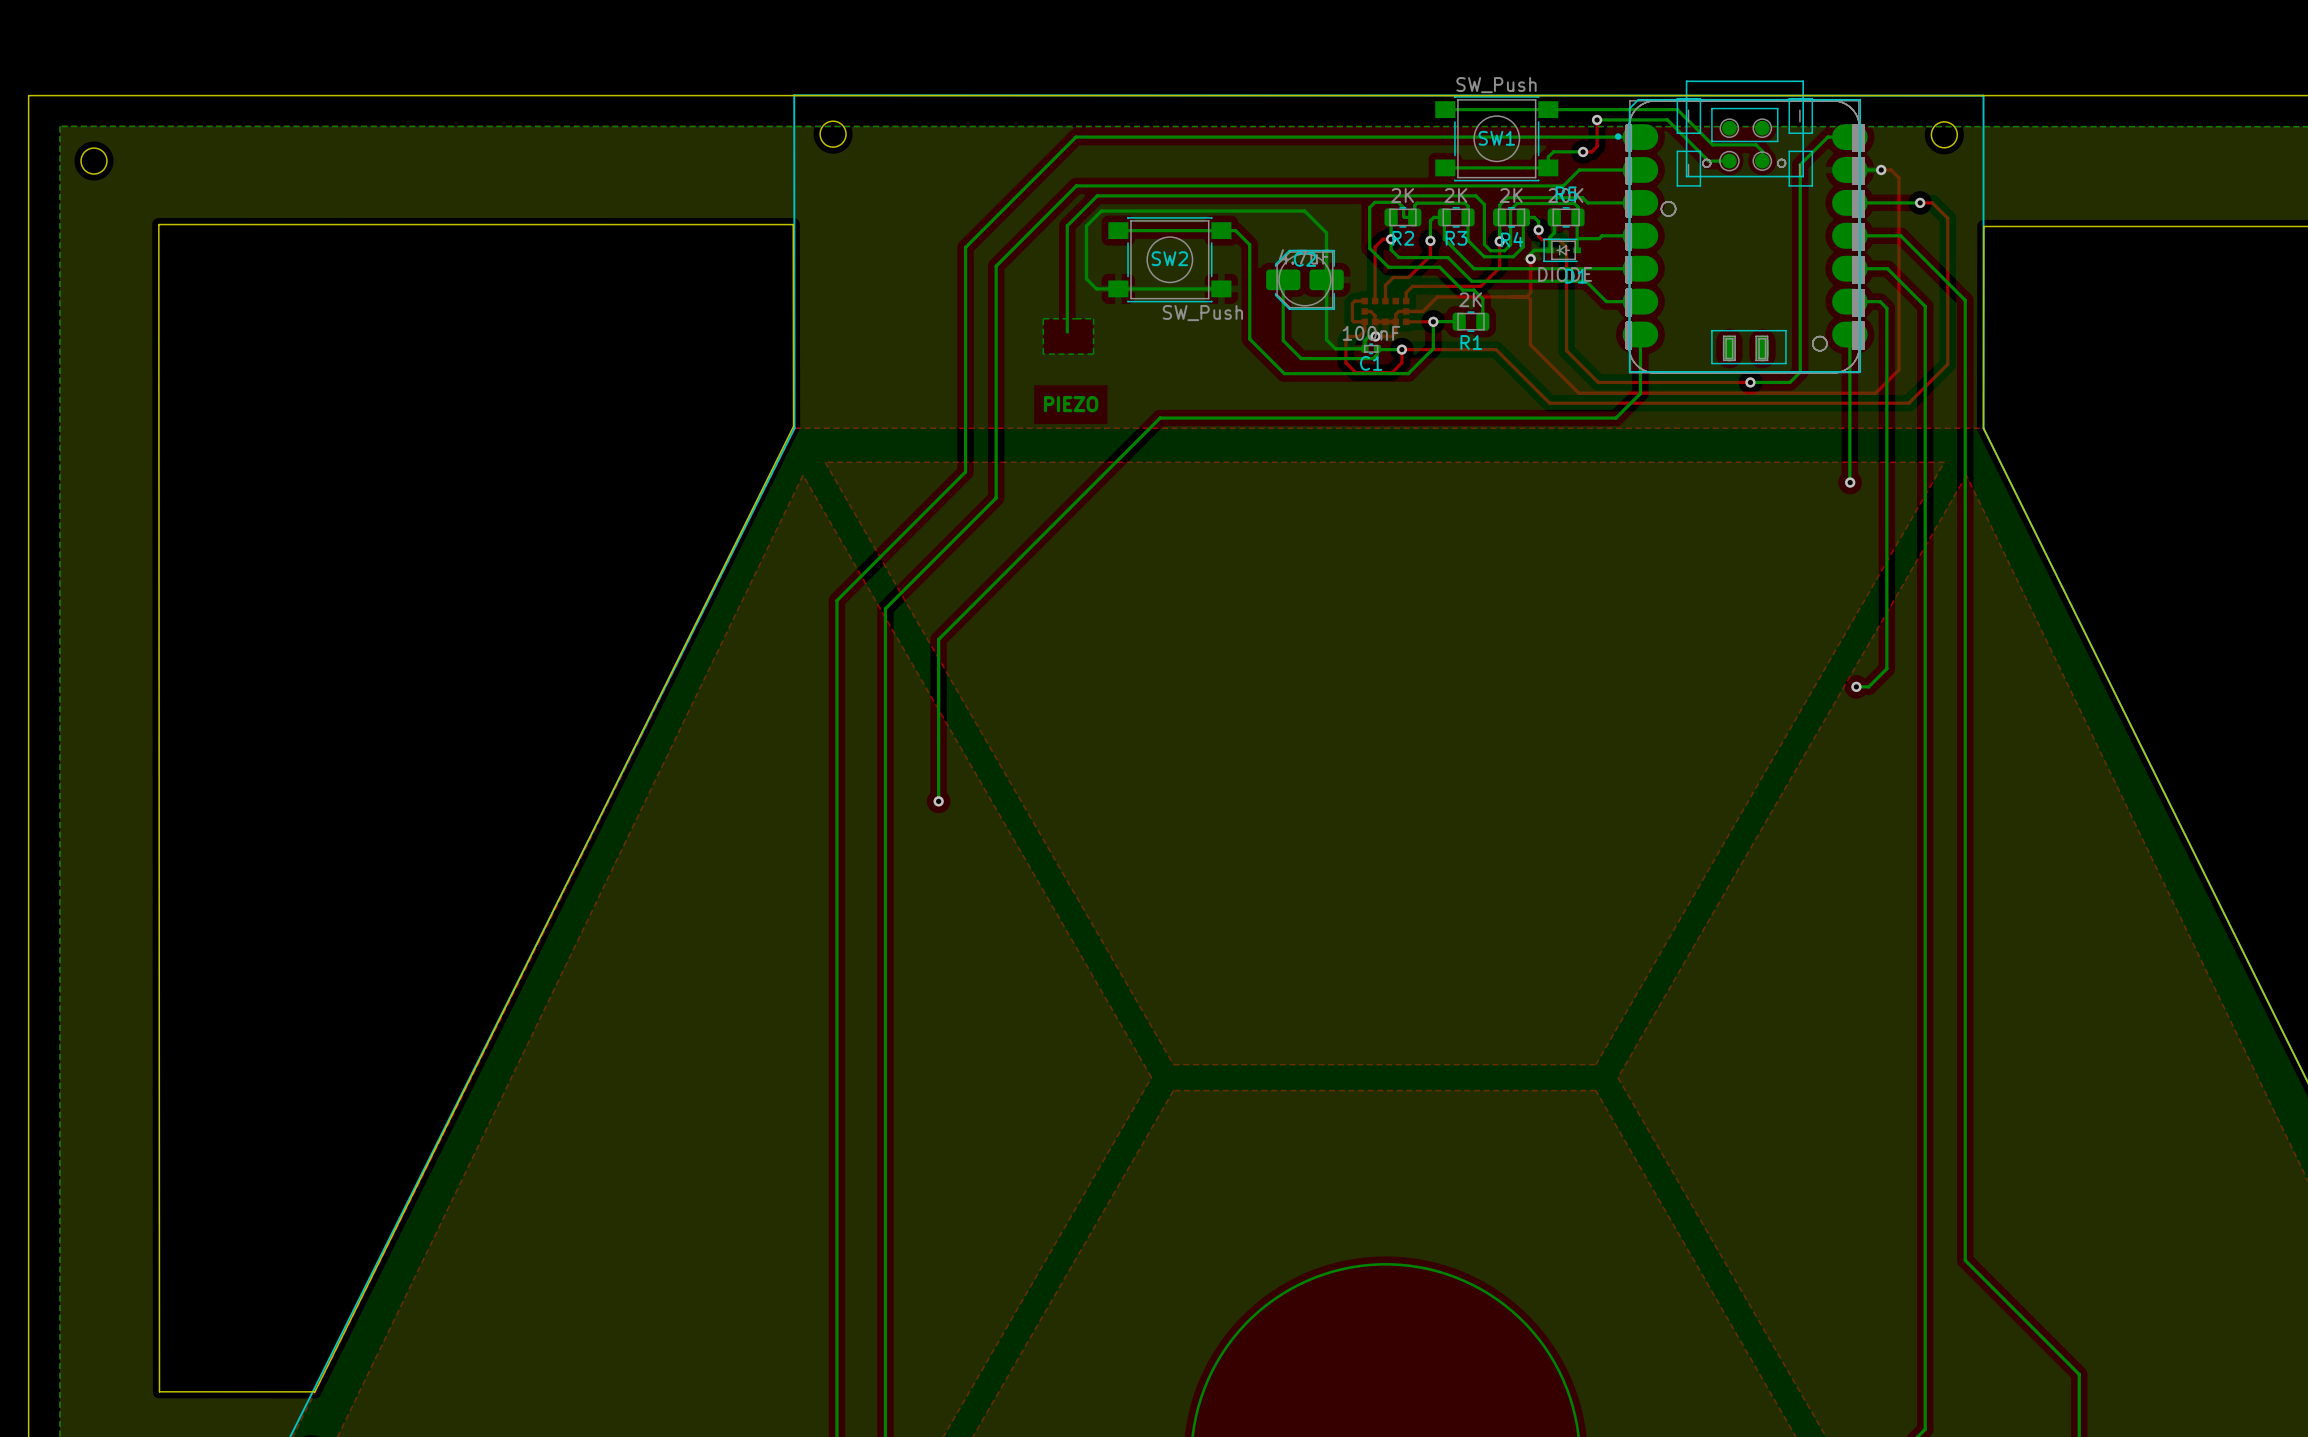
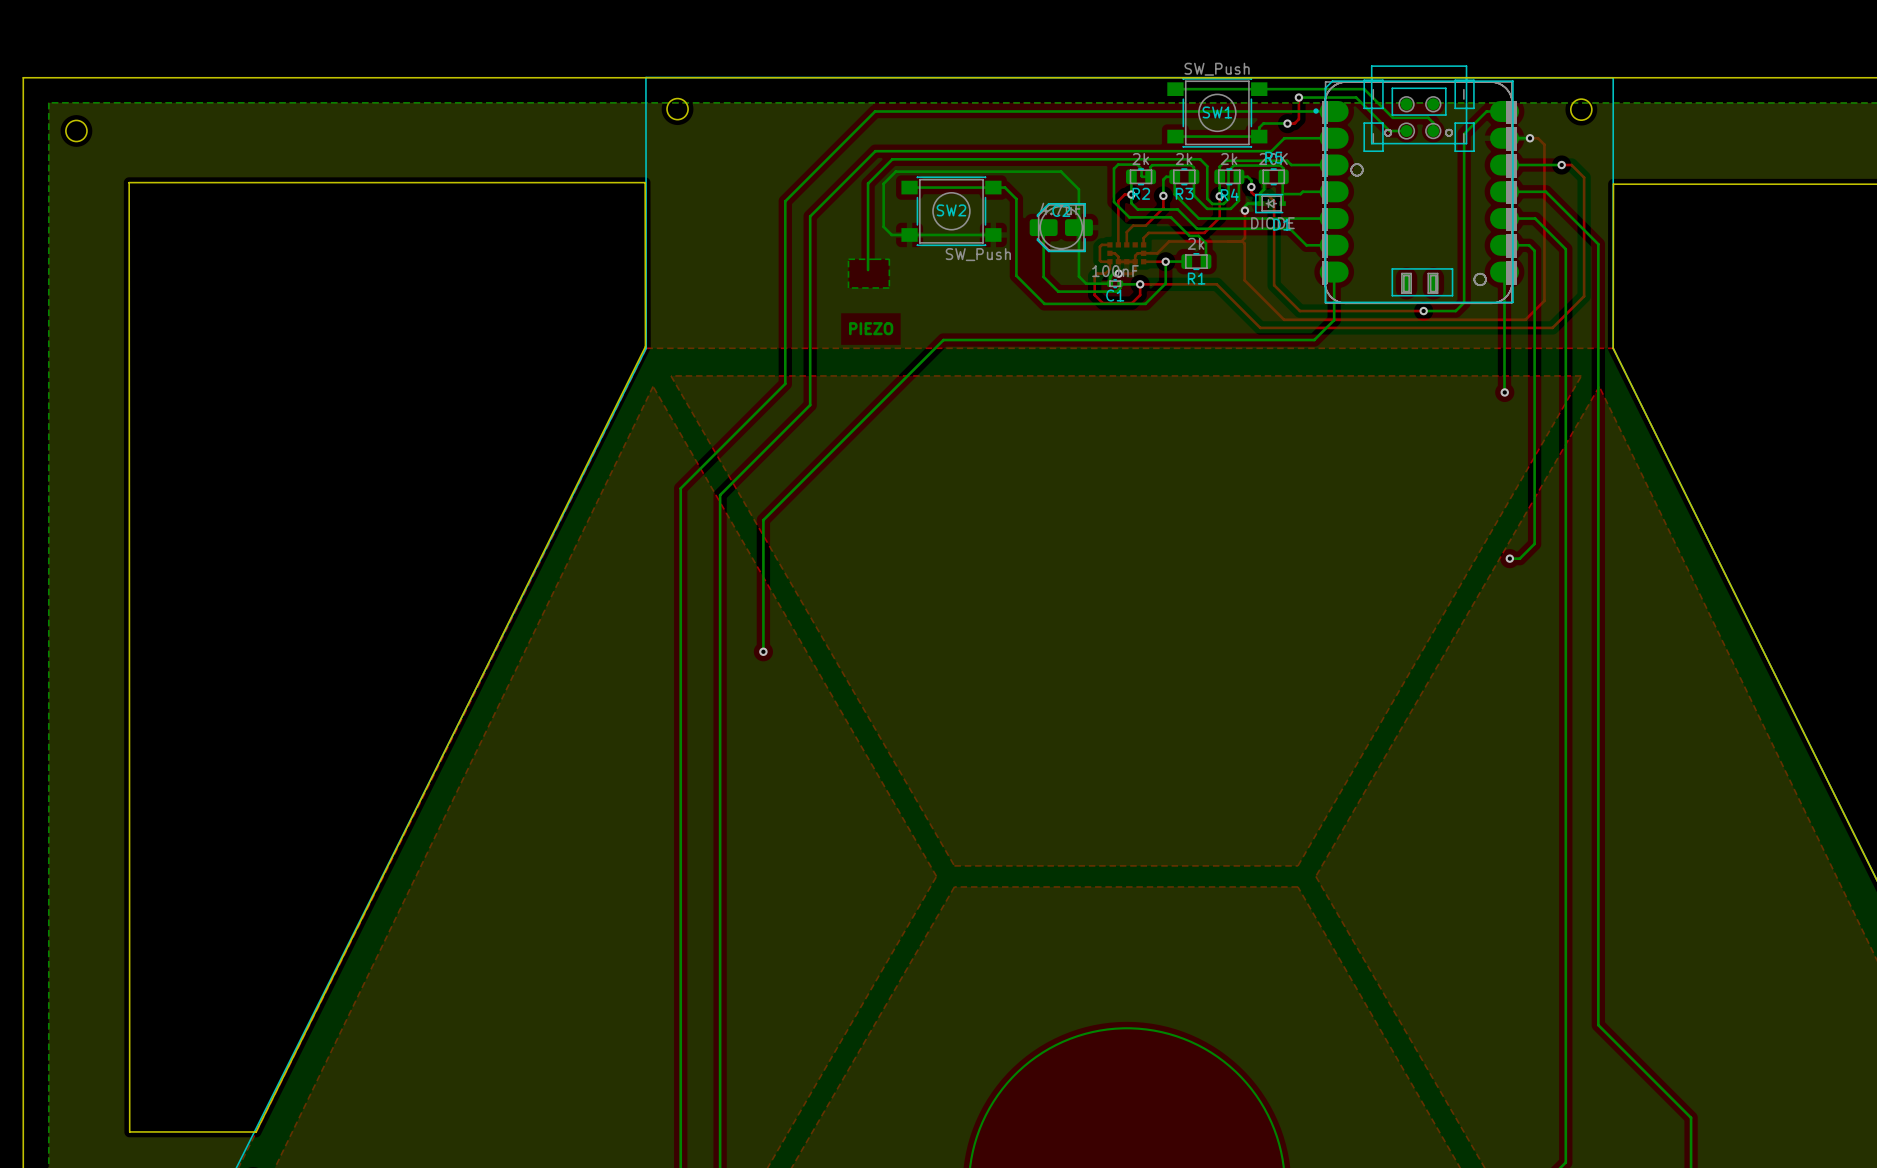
R2 value: 2K (1402, 195) -> 2k (1140, 159)
R3 value: 2K (1455, 195) -> 2k (1184, 159)
R4 value: 2K (1511, 195) -> 2k (1229, 159)
R1 value: 2K (1470, 299) -> 2k (1196, 243)

